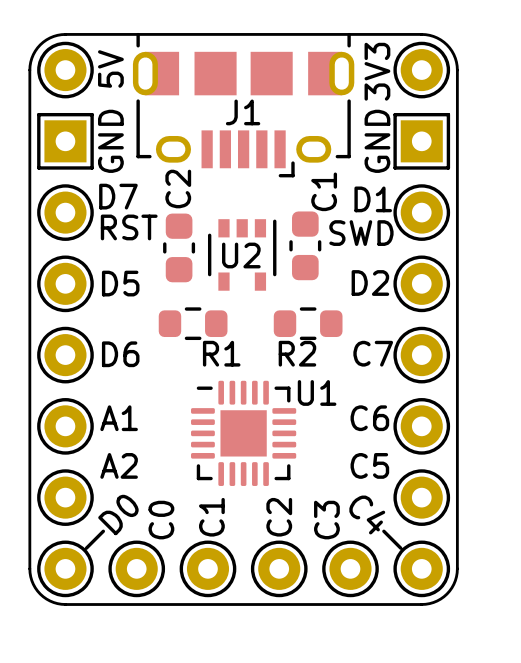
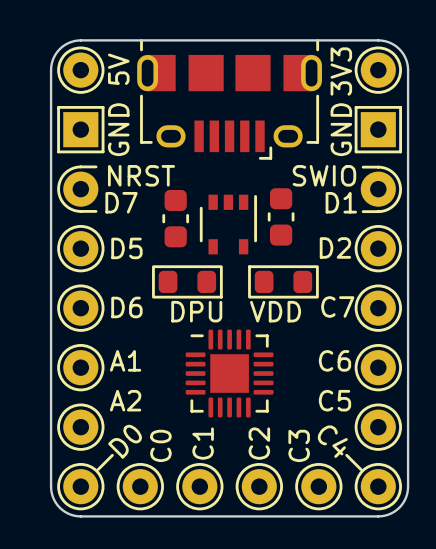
J1 name: J1 (243, 112) -> none
part footprint: [37, 184, 94, 241] -> [63, 171, 99, 207]
part footprint: [393, 184, 451, 241] -> [360, 171, 396, 207]
line: none -> (96, 166) (78, 167) (70, 169) (62, 176) (58, 189) (62, 201) (70, 208) (78, 211) (96, 211)
line: none -> (363, 167) (381, 167) (388, 169) (398, 179) (400, 189) (398, 199) (388, 209) (381, 211) (363, 211)
C2 name: C2 (178, 189) -> none
C1 name: C1 (324, 191) -> none
text: none -> SWIO (324, 175)
text: RST (129, 227) -> NRST (141, 175)
text: SWD (361, 233) -> none
U2 name: U2 (241, 255) -> none
R1: (193, 323) -> none
part: none -> (187, 281)
R2: (308, 323) -> none
part: none -> (283, 281)
text: none -> DPU (196, 311)
text: none -> VDD (275, 311)
U1 name: U1 (317, 392) -> none

